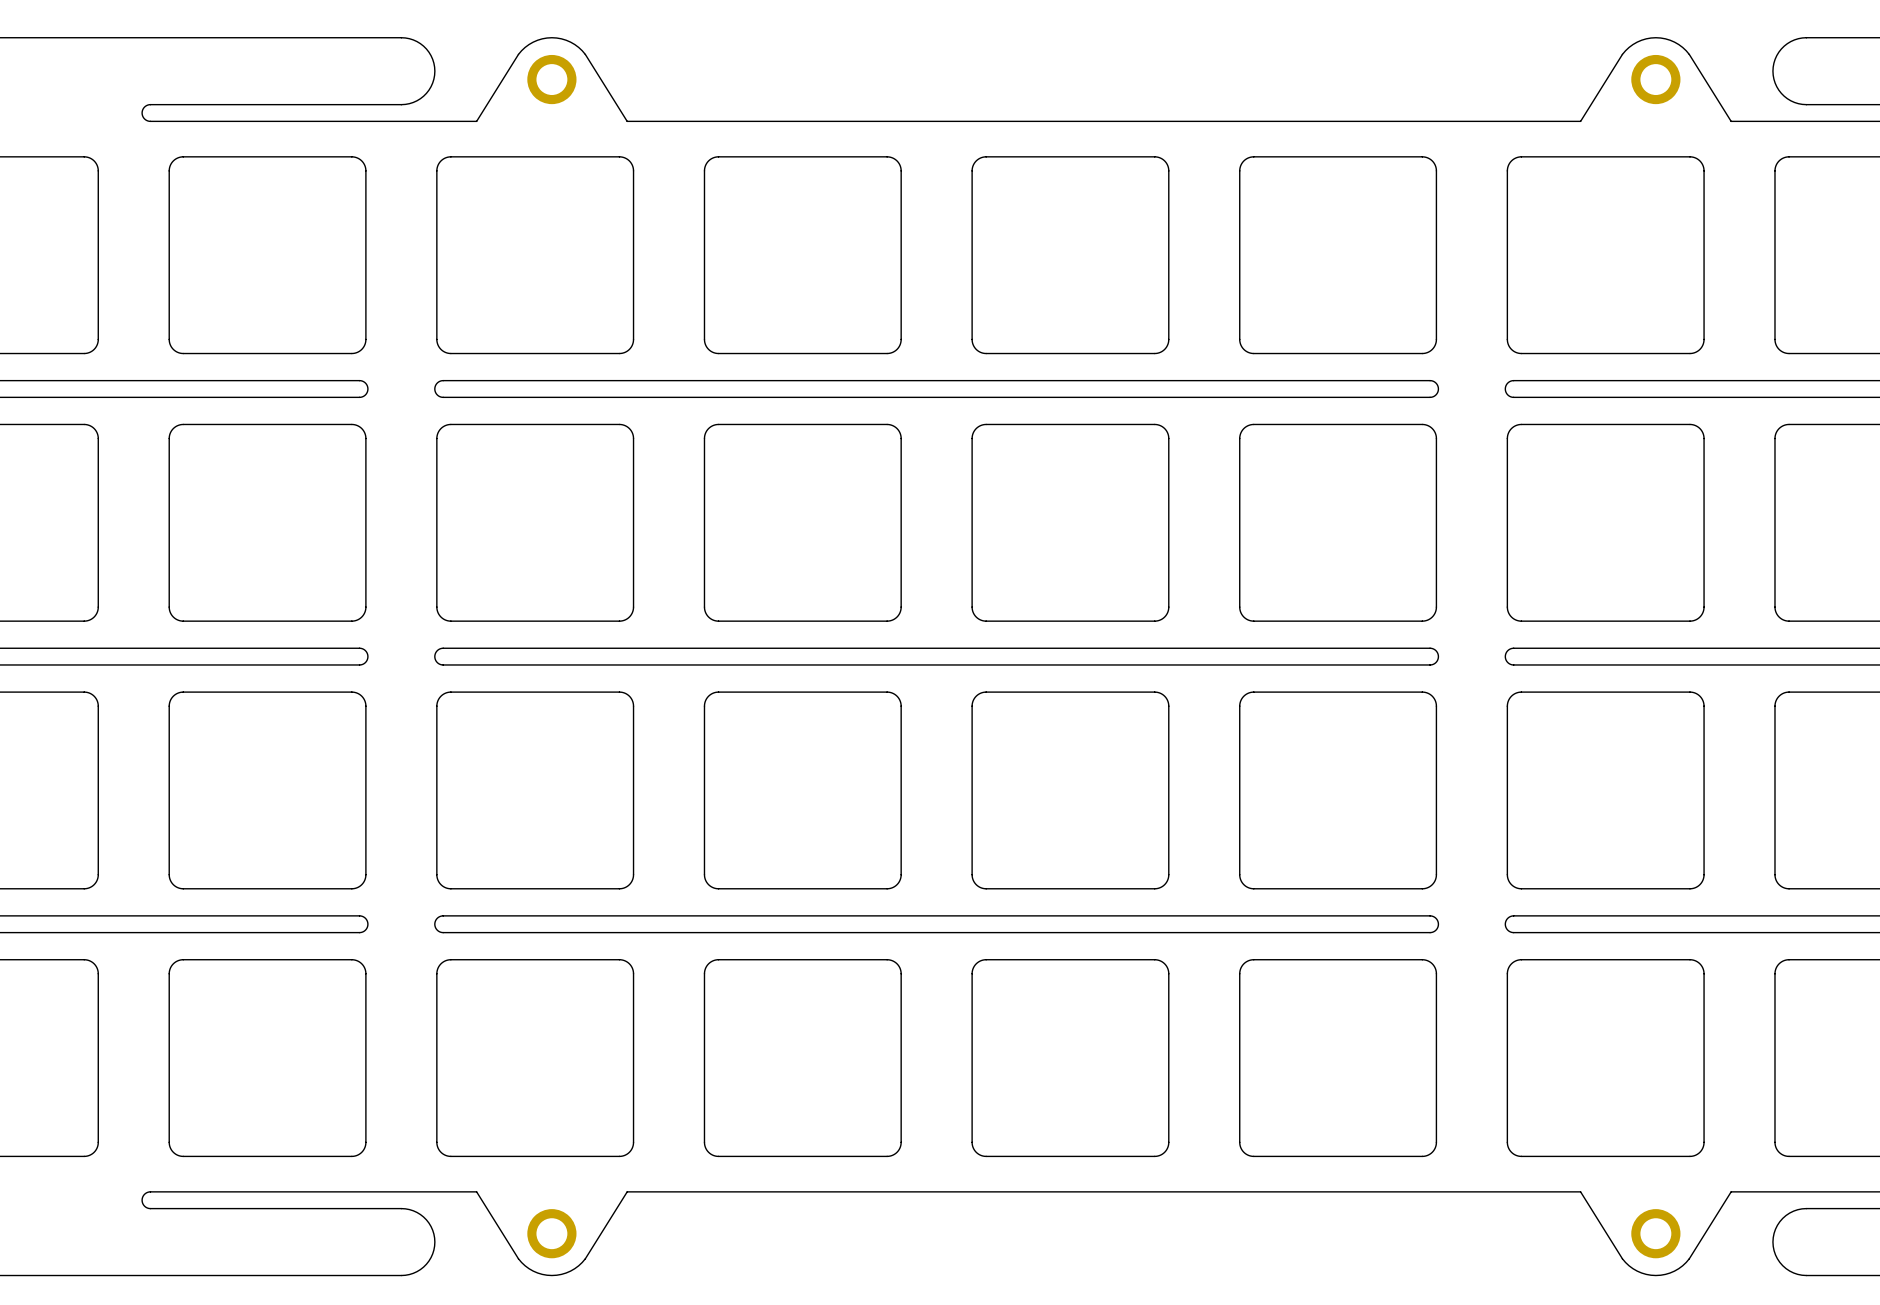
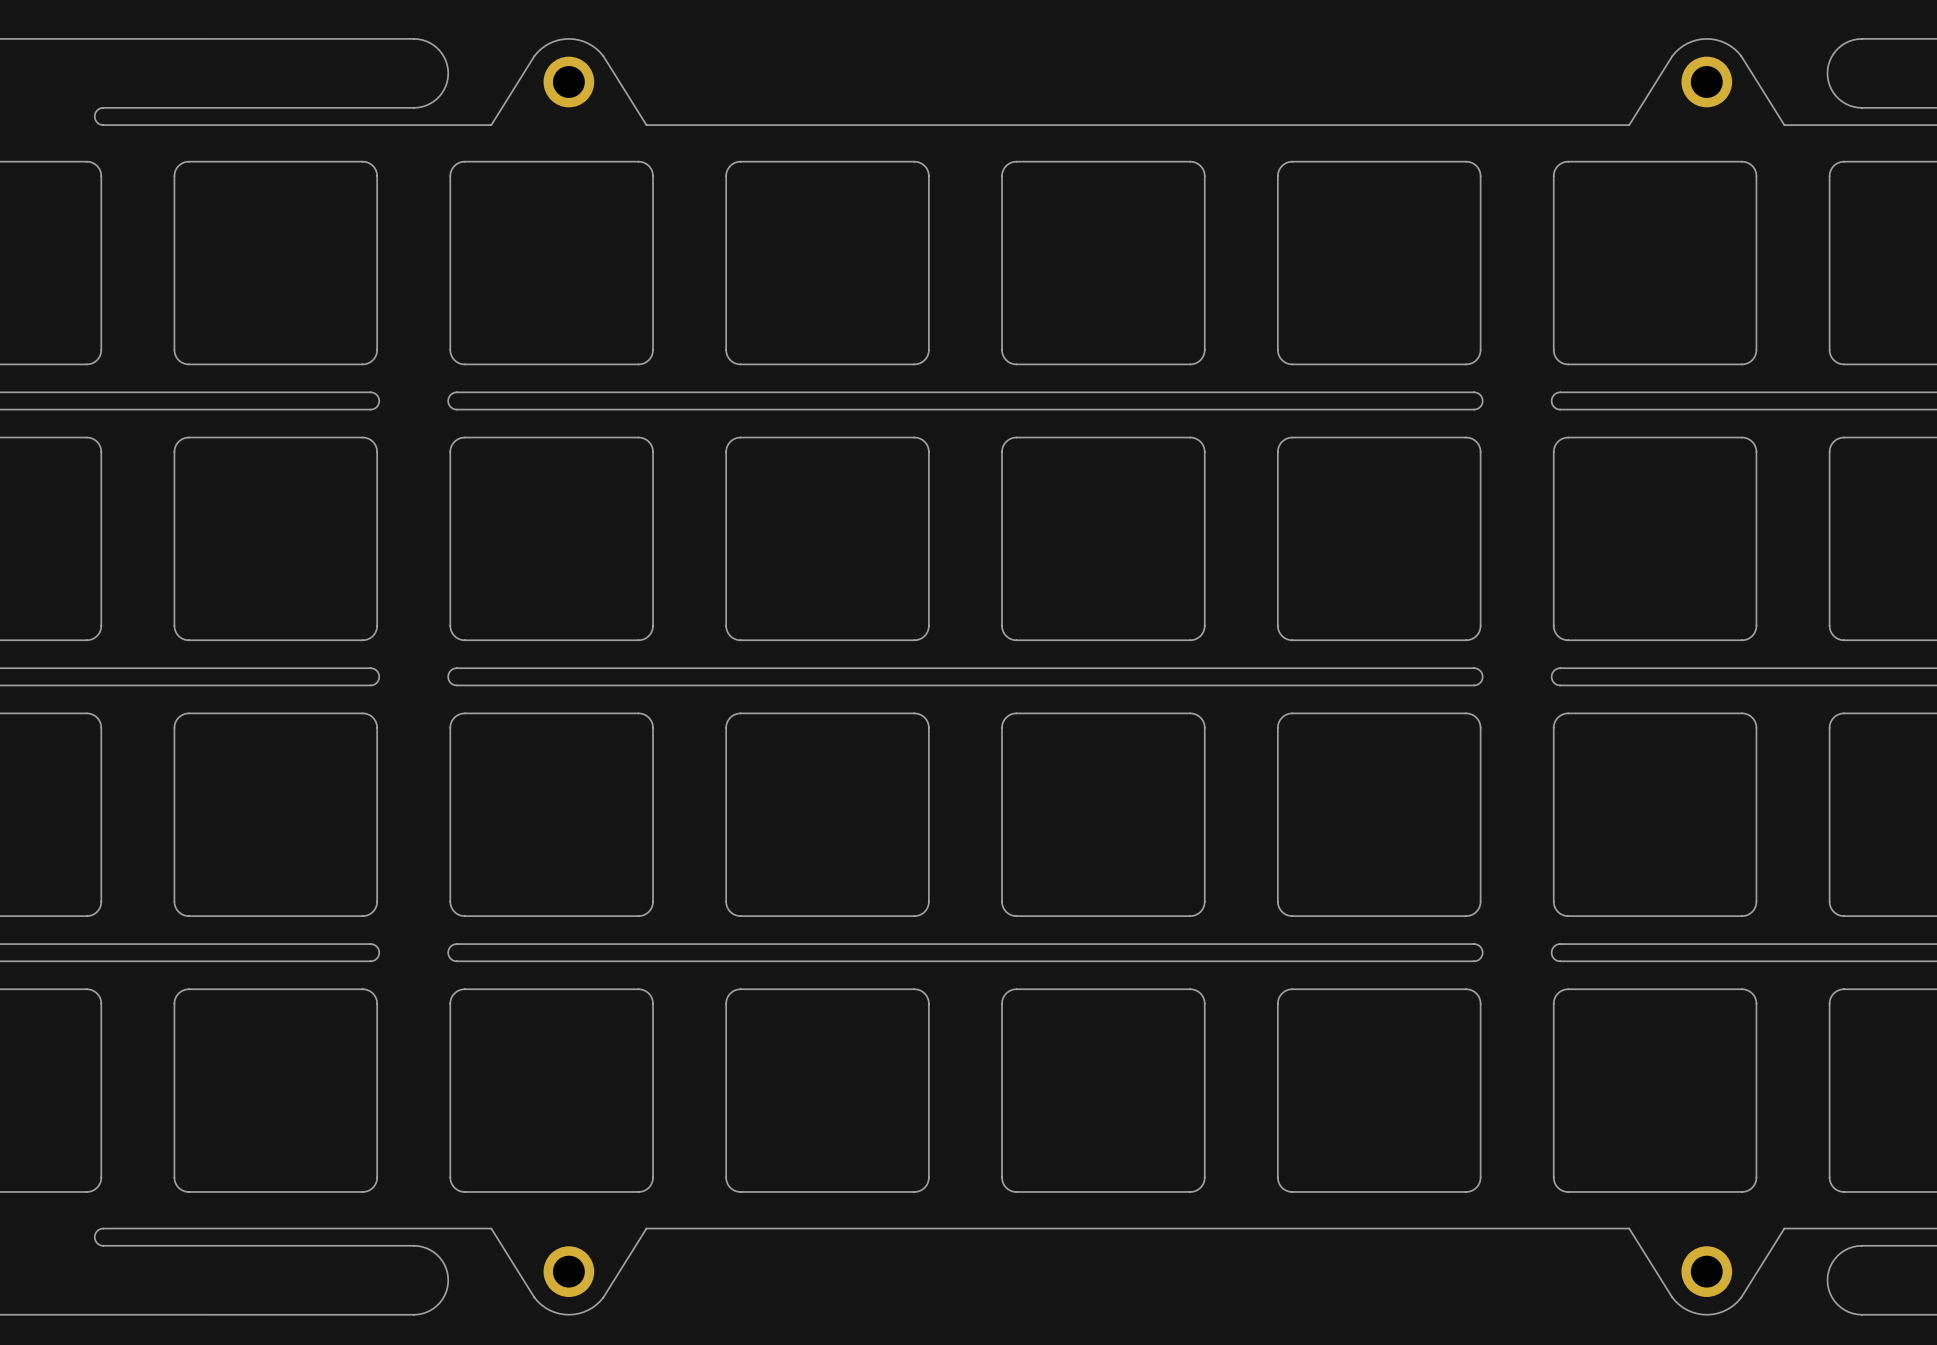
board edge: (401, 104) (149, 104) (144, 107) (142, 113) (144, 119) (150, 121) -> (413, 107) (103, 107) (97, 110) (94, 115) (96, 121) (102, 125) (155, 125)
board edge: (150, 1191) (144, 1193) (142, 1200) (144, 1205) (150, 1208) -> (155, 1228) (102, 1228) (96, 1231) (94, 1237) (96, 1242) (102, 1245) (155, 1245)

